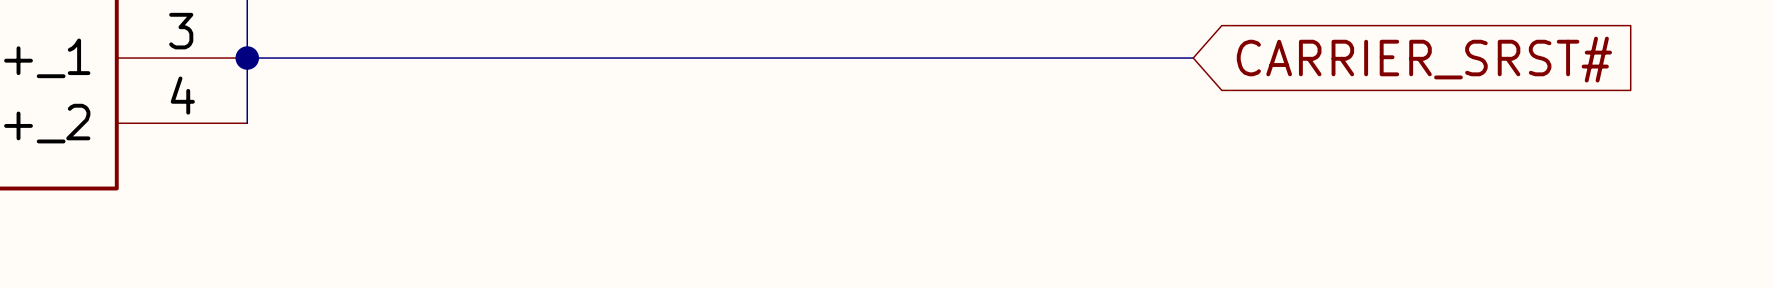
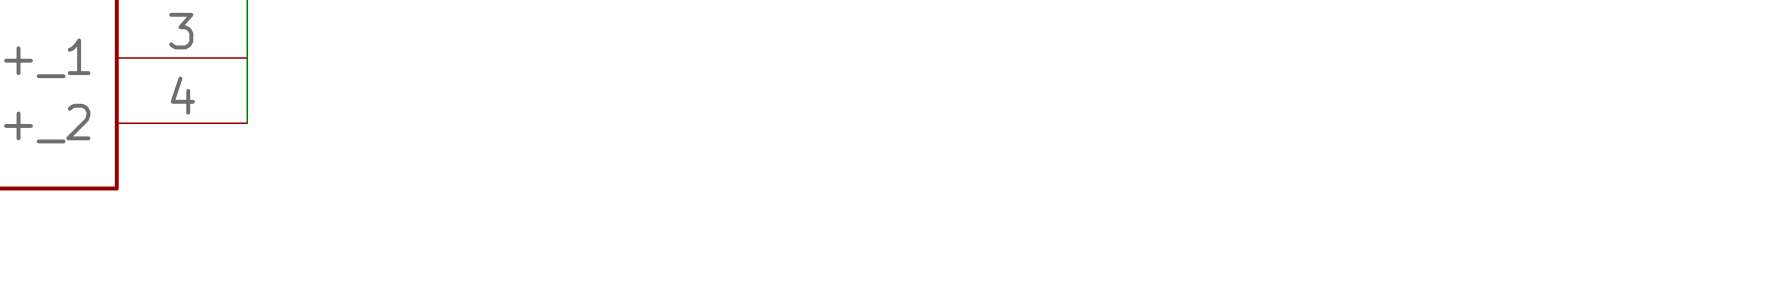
wire: (247, 58) (1193, 58) -> none
junction: (247, 58) -> none
global label: CARRIER_SRST# (1424, 59) -> none

